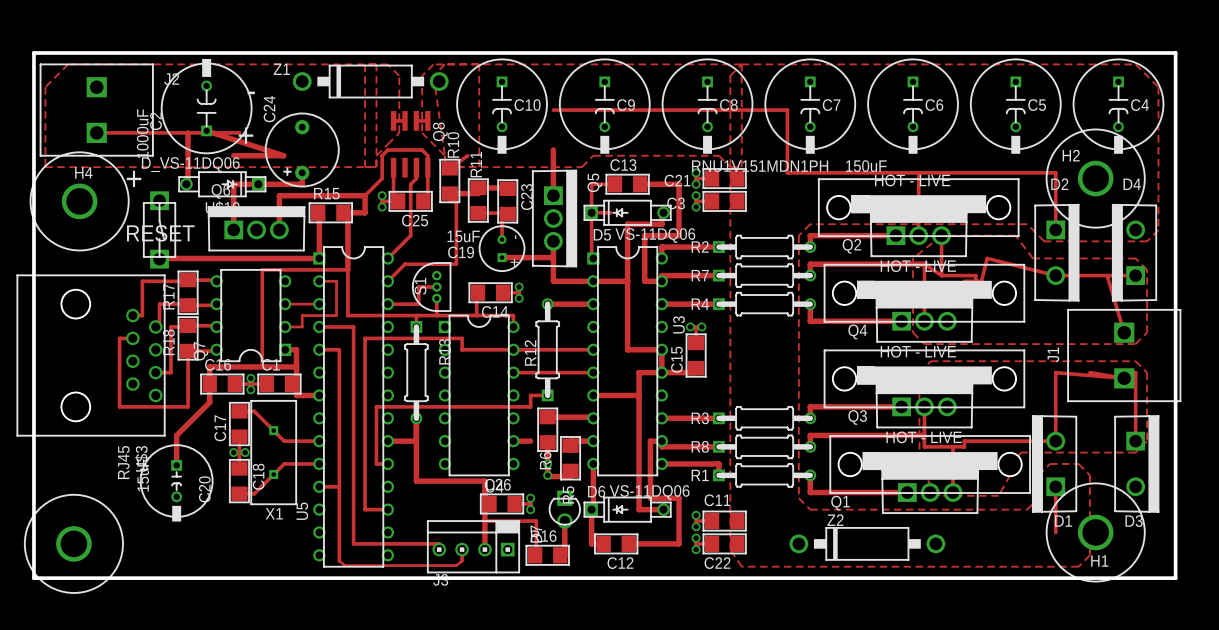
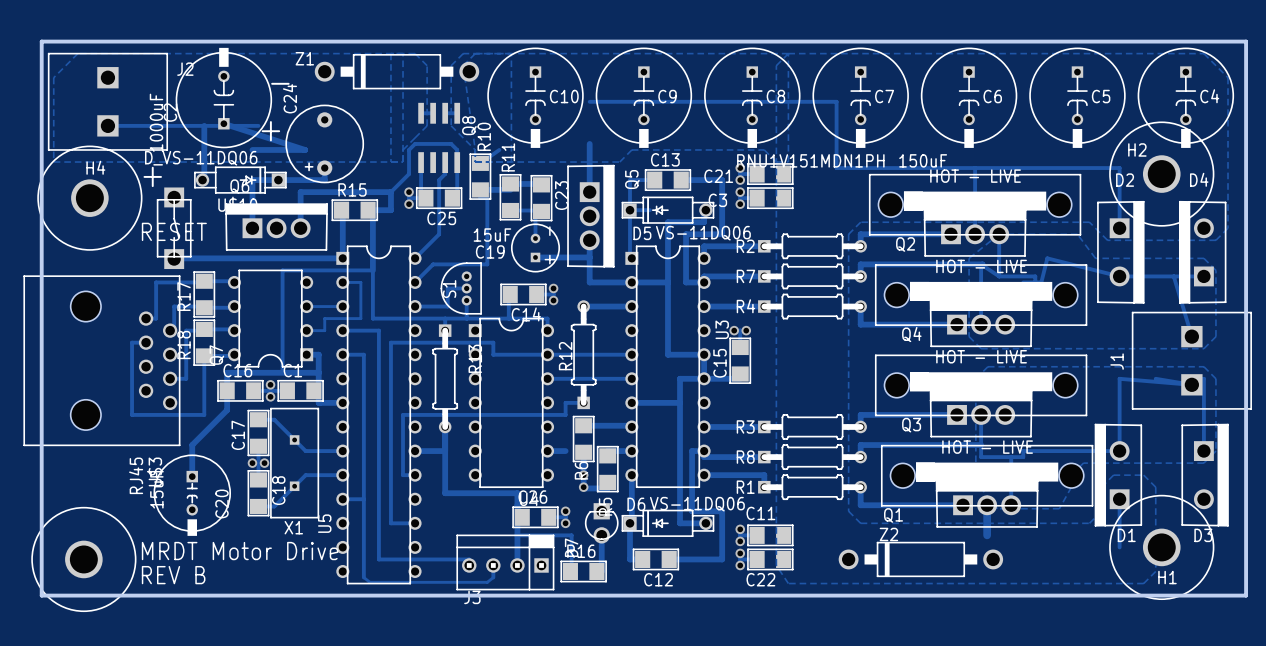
track: none -> (987, 505) (987, 535)
text: none -> MRDT Motor Drive (240, 551)
text: none -> REV B (173, 575)

